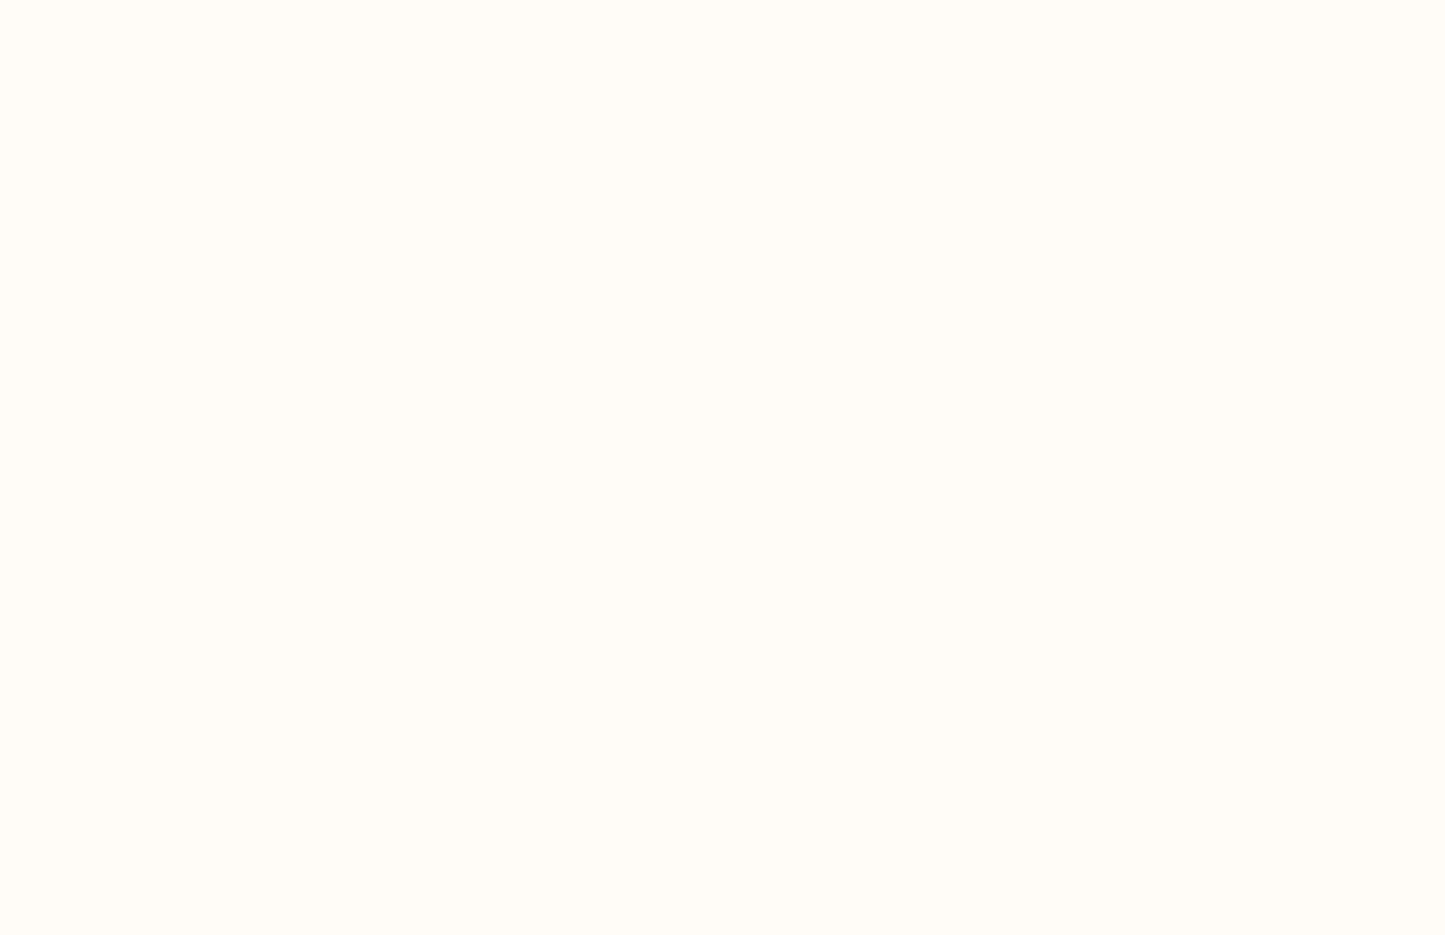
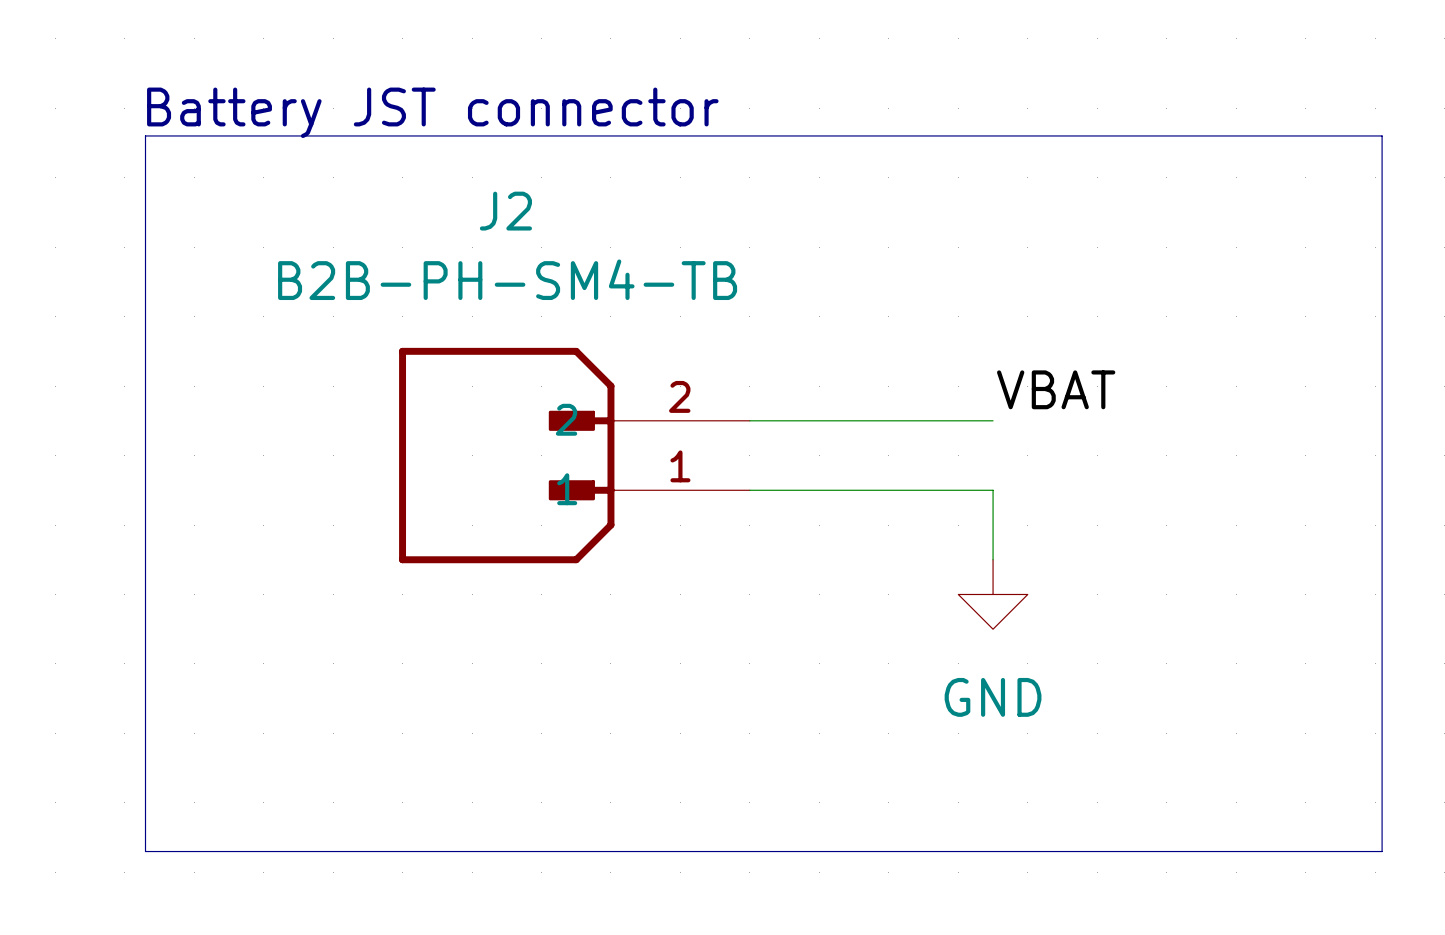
text: none -> Battery JST connector (432, 112)
line: none -> (145, 135) (1382, 135) (1382, 851) (145, 851) (145, 135)
label: none -> VBAT (1056, 389)
wire: none -> (749, 420) (993, 420)
J2: none -> B2B-PH-SM4-TB (574, 455)
wire: none -> (749, 490) (993, 490) (993, 559)
power symbol: none -> GND (993, 594)

